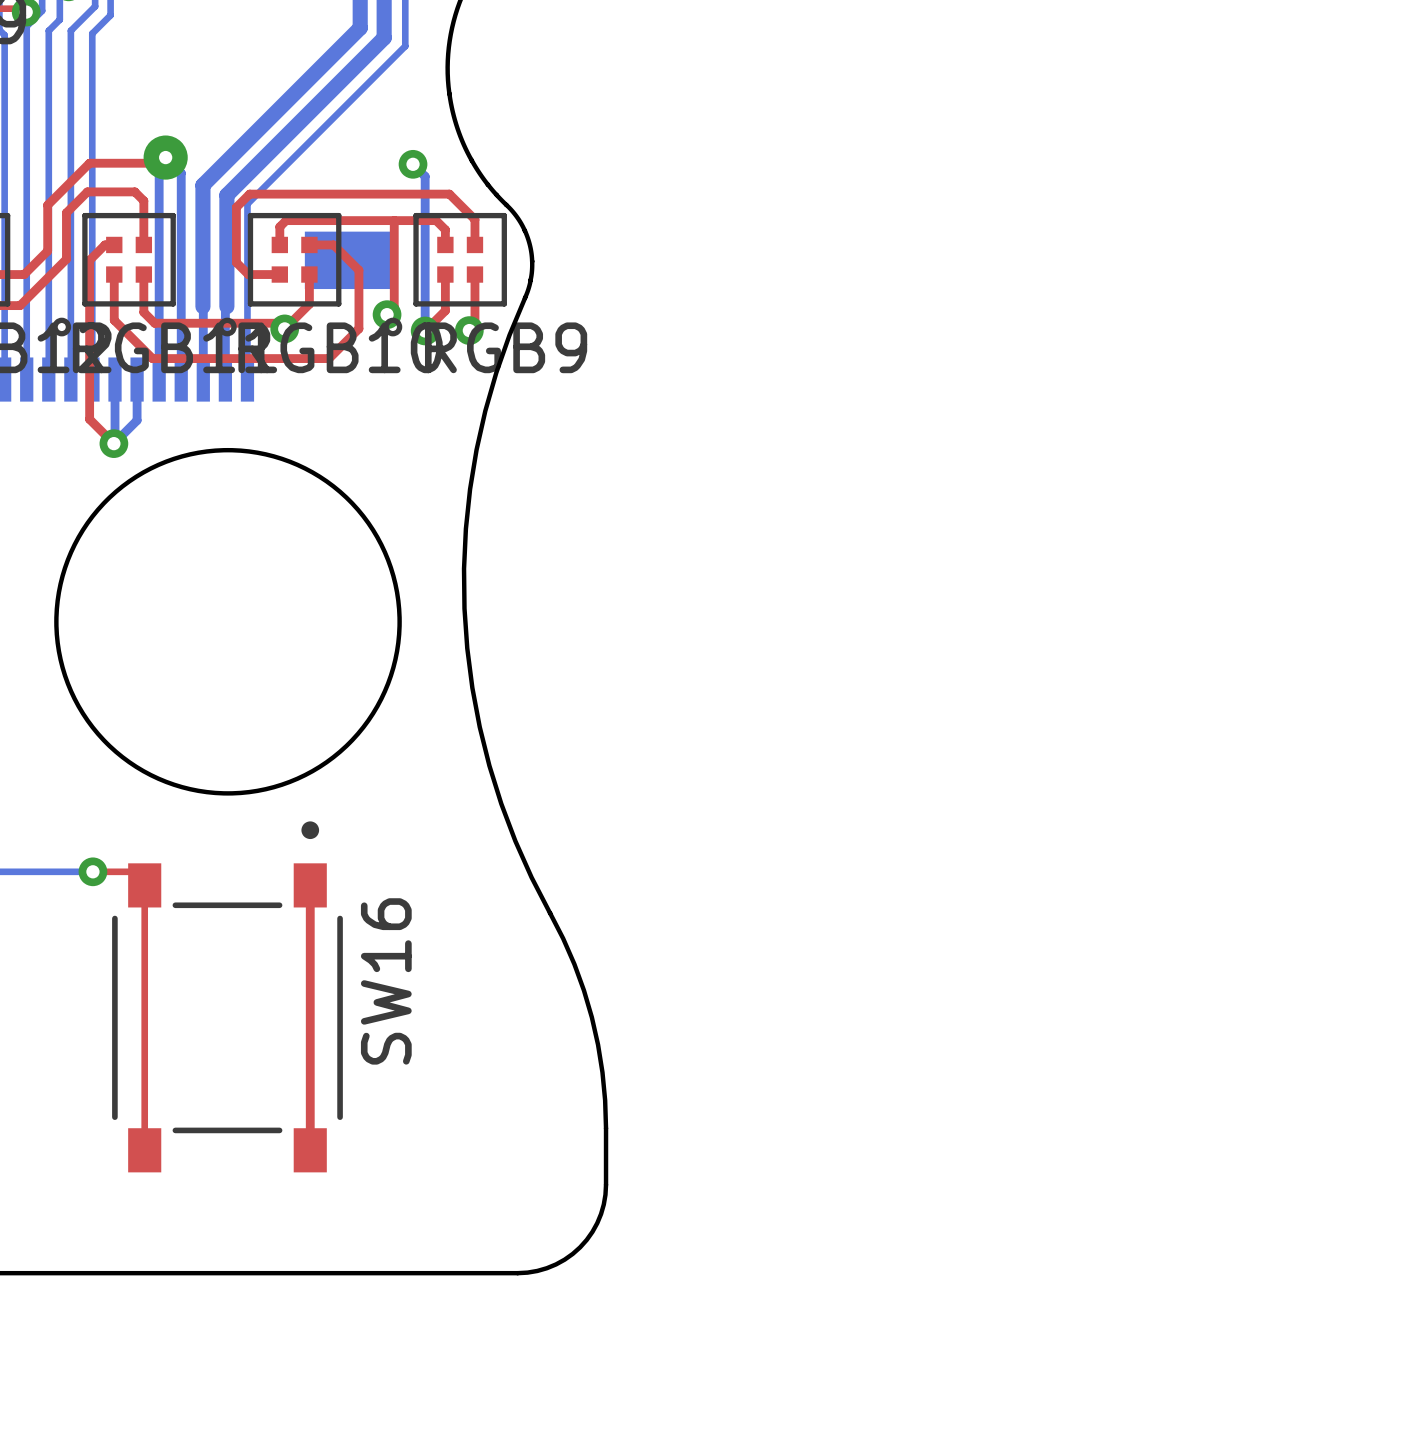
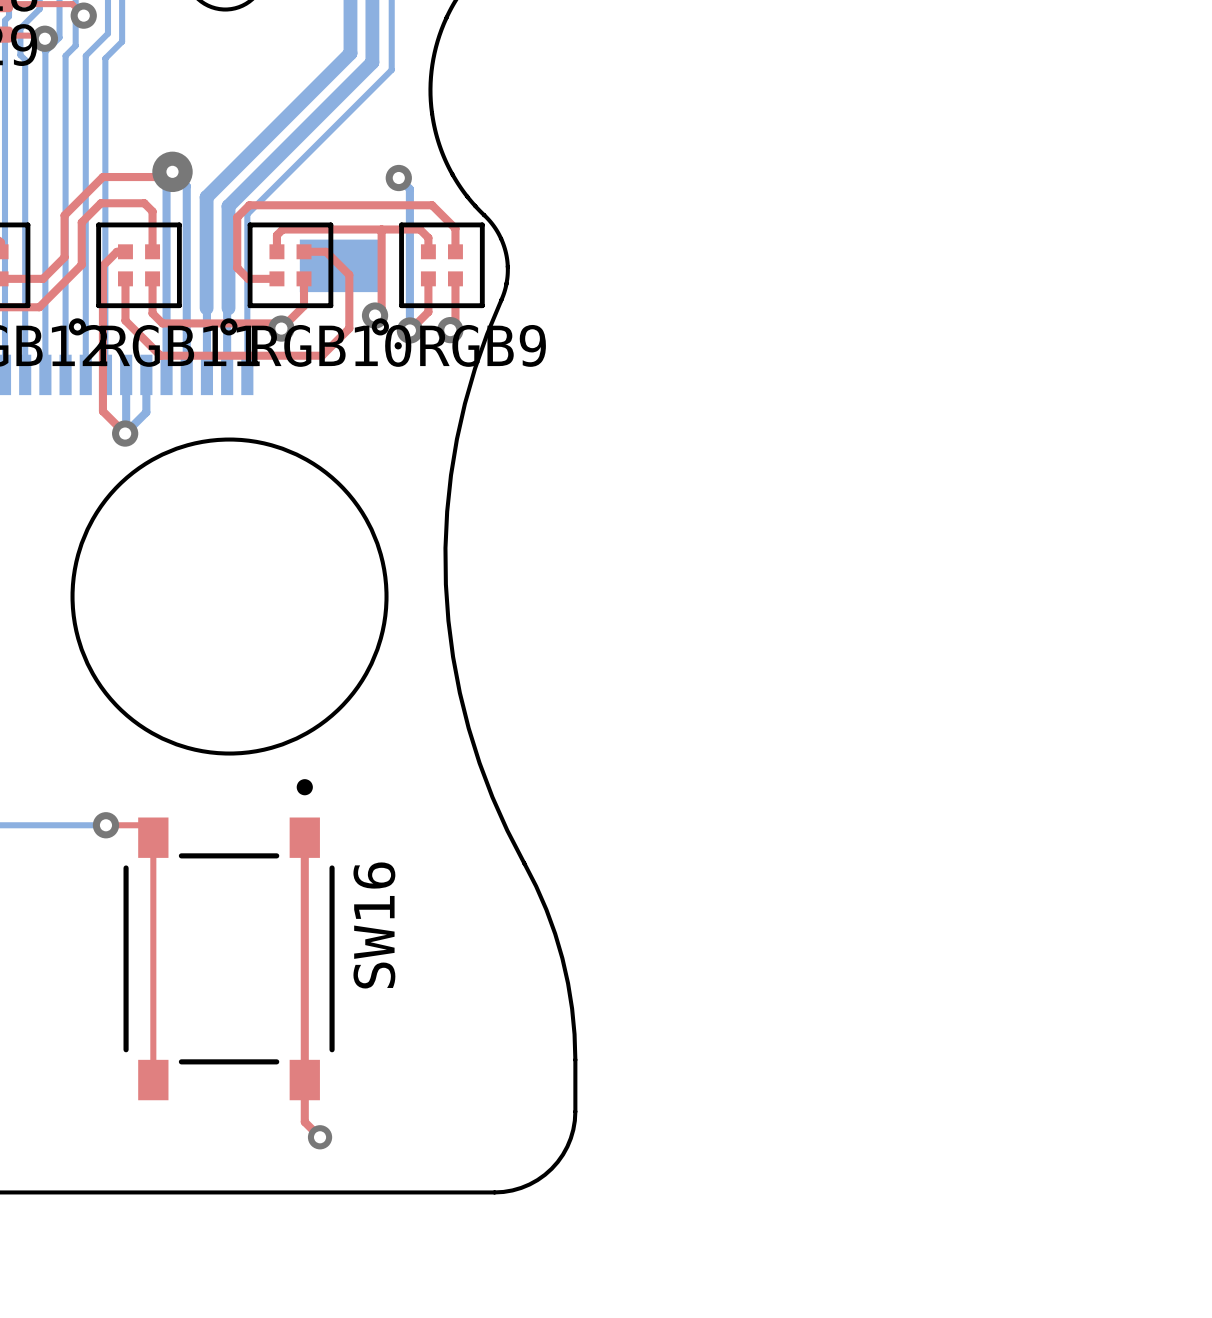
top track: none -> (304, 1080) (304, 1122) (320, 1137)
via: none -> (320, 1137)

